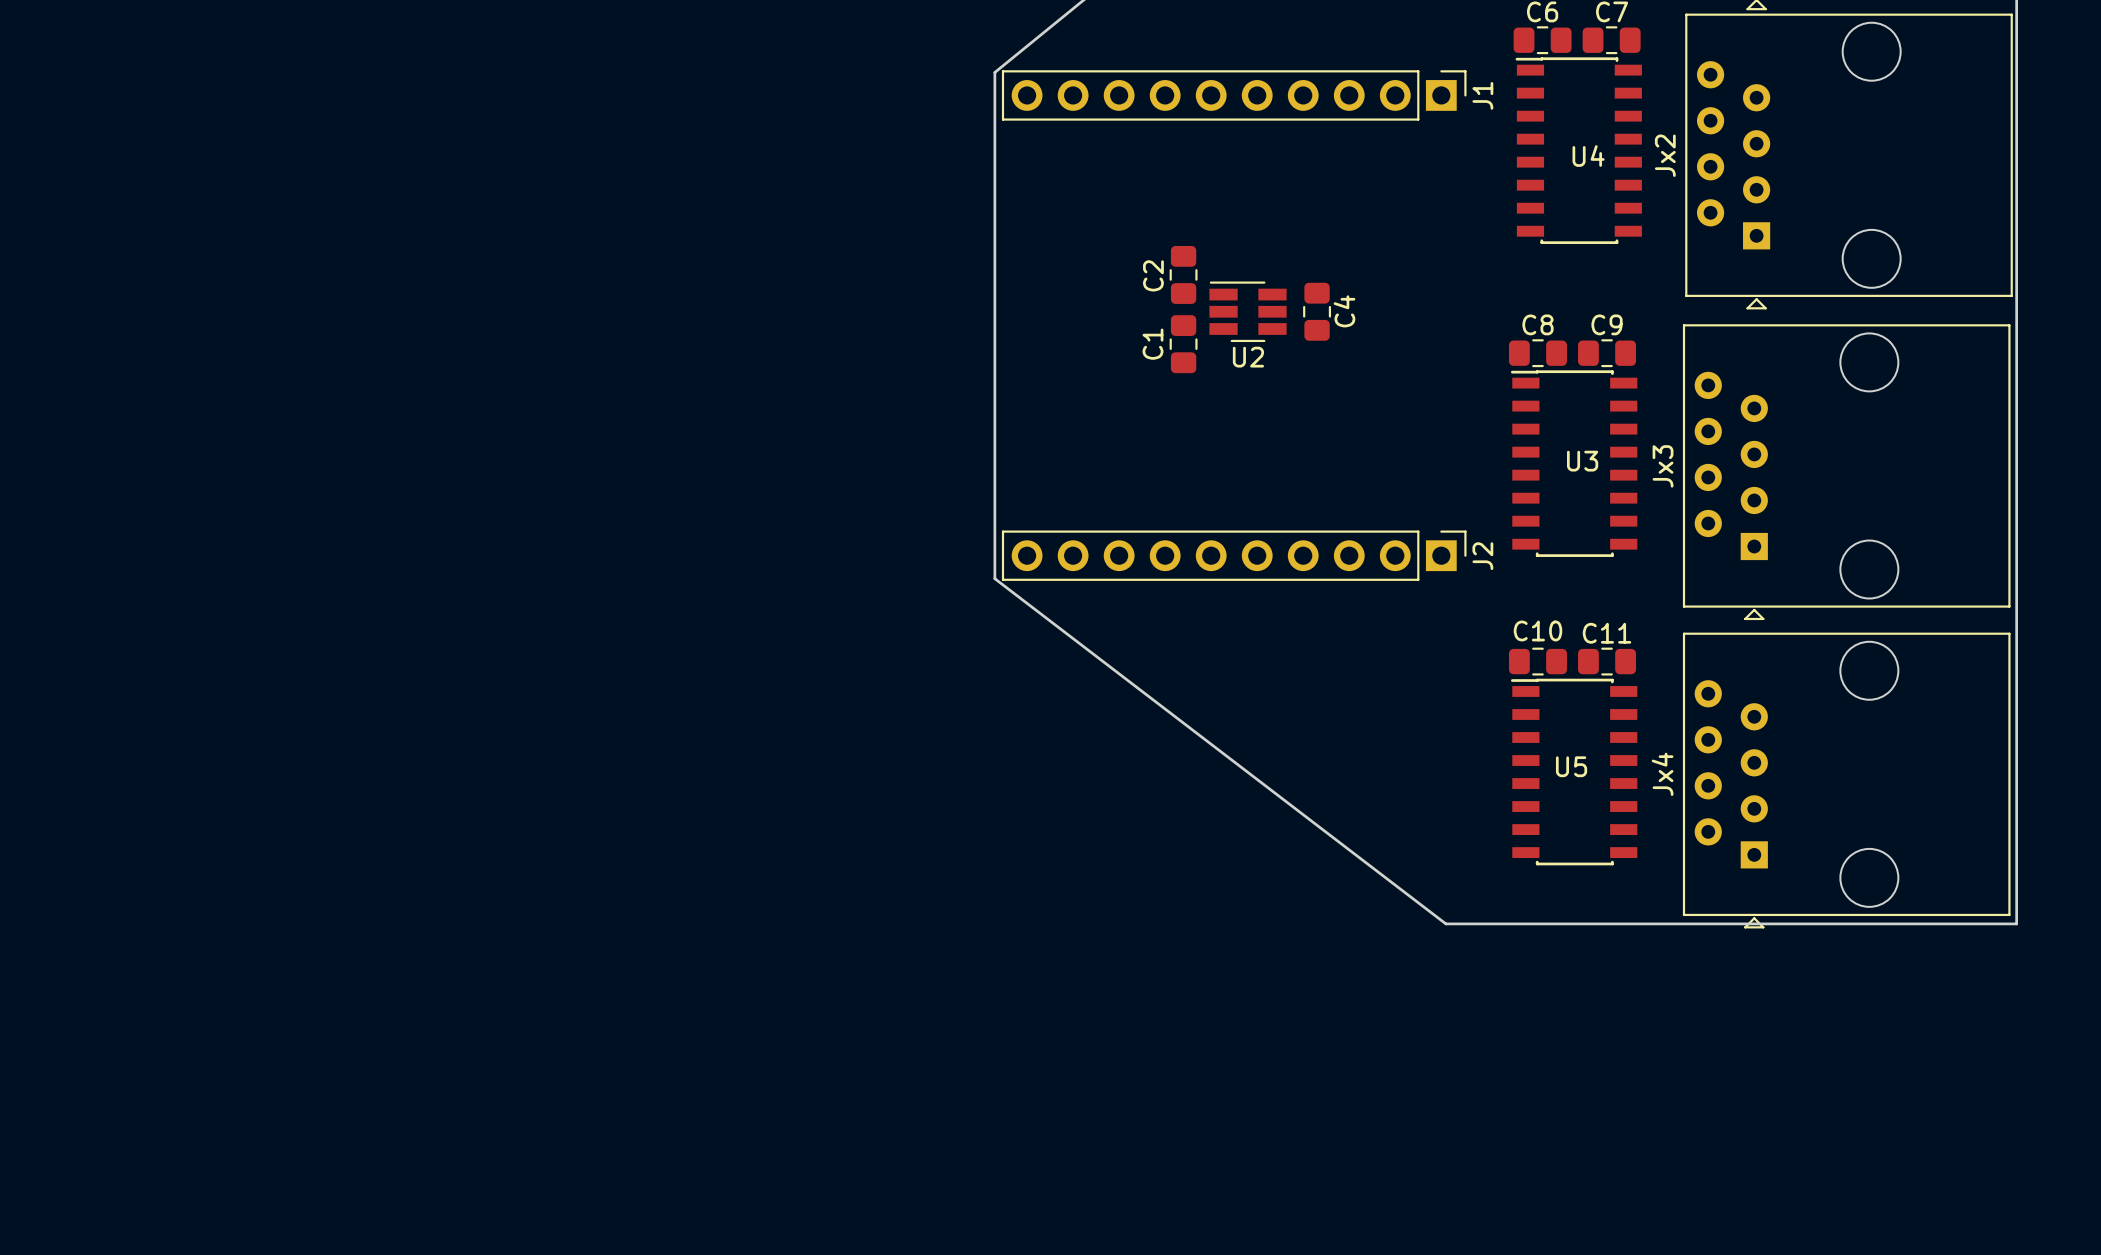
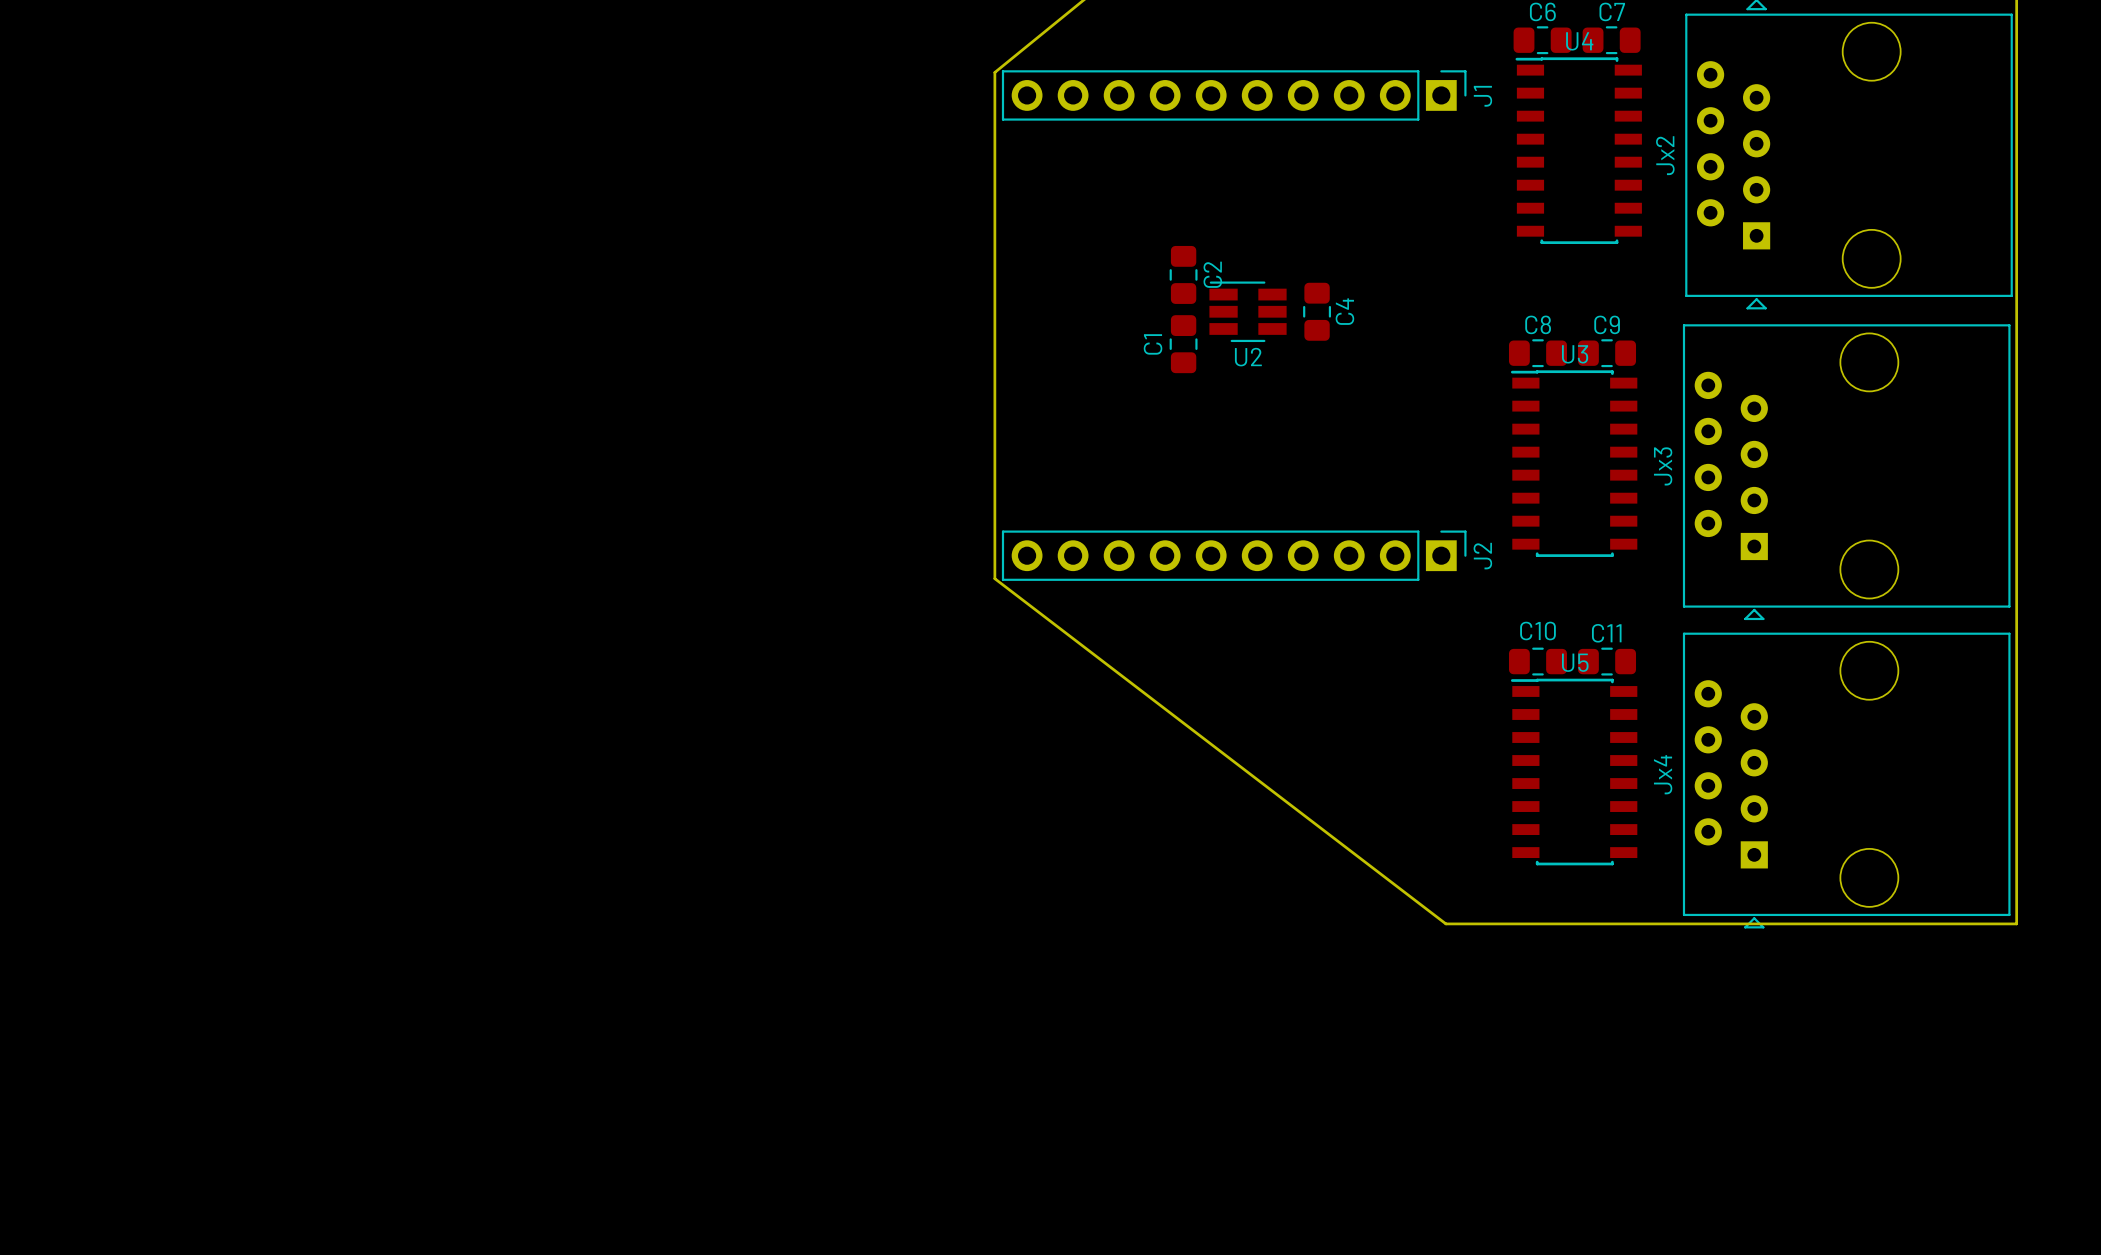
U4 name position: U4 (1588, 156) -> U4 (1579, 41)
C2 name position: C2 (1153, 275) -> C2 (1212, 274)
U3 name position: U3 (1582, 461) -> U3 (1575, 354)
U5 name position: U5 (1571, 766) -> U5 (1575, 662)

